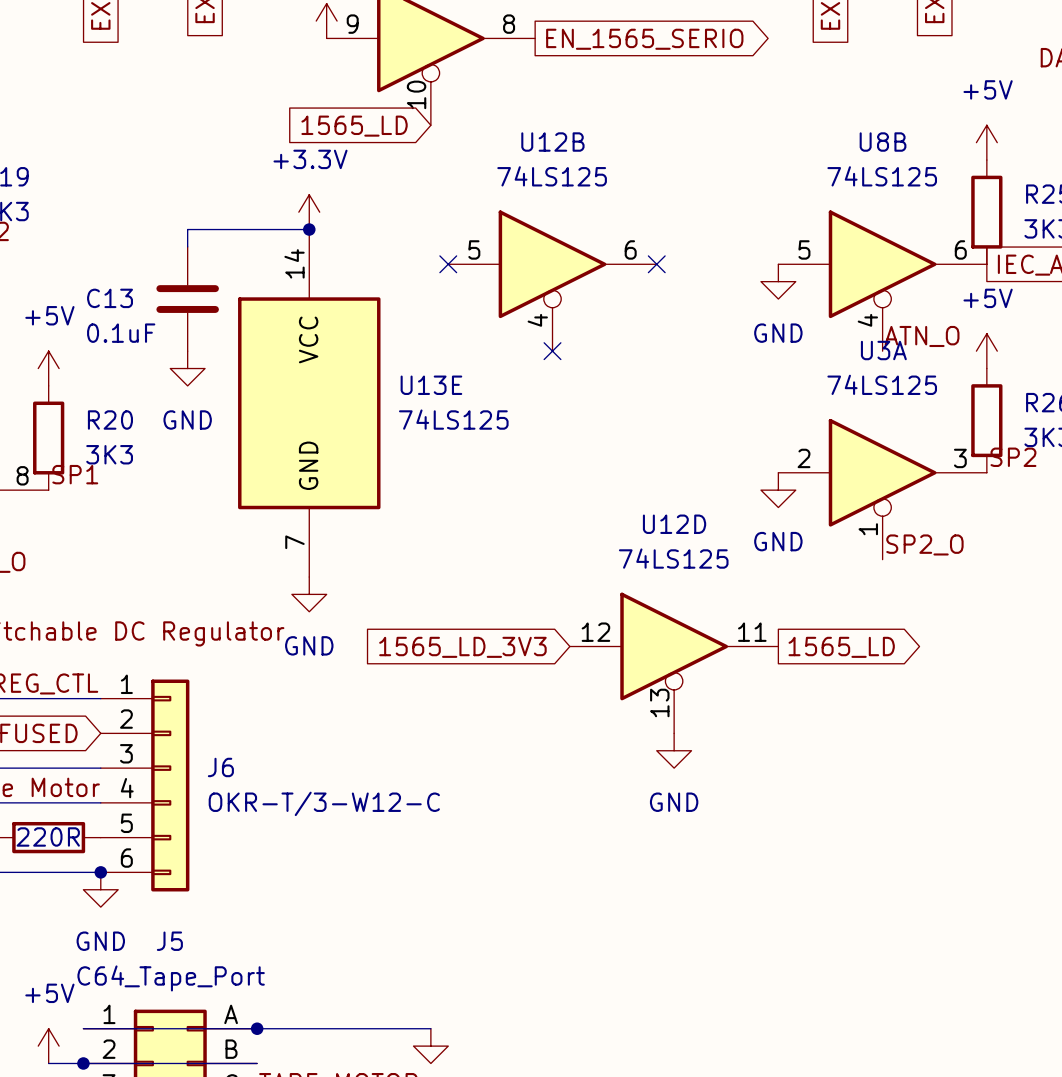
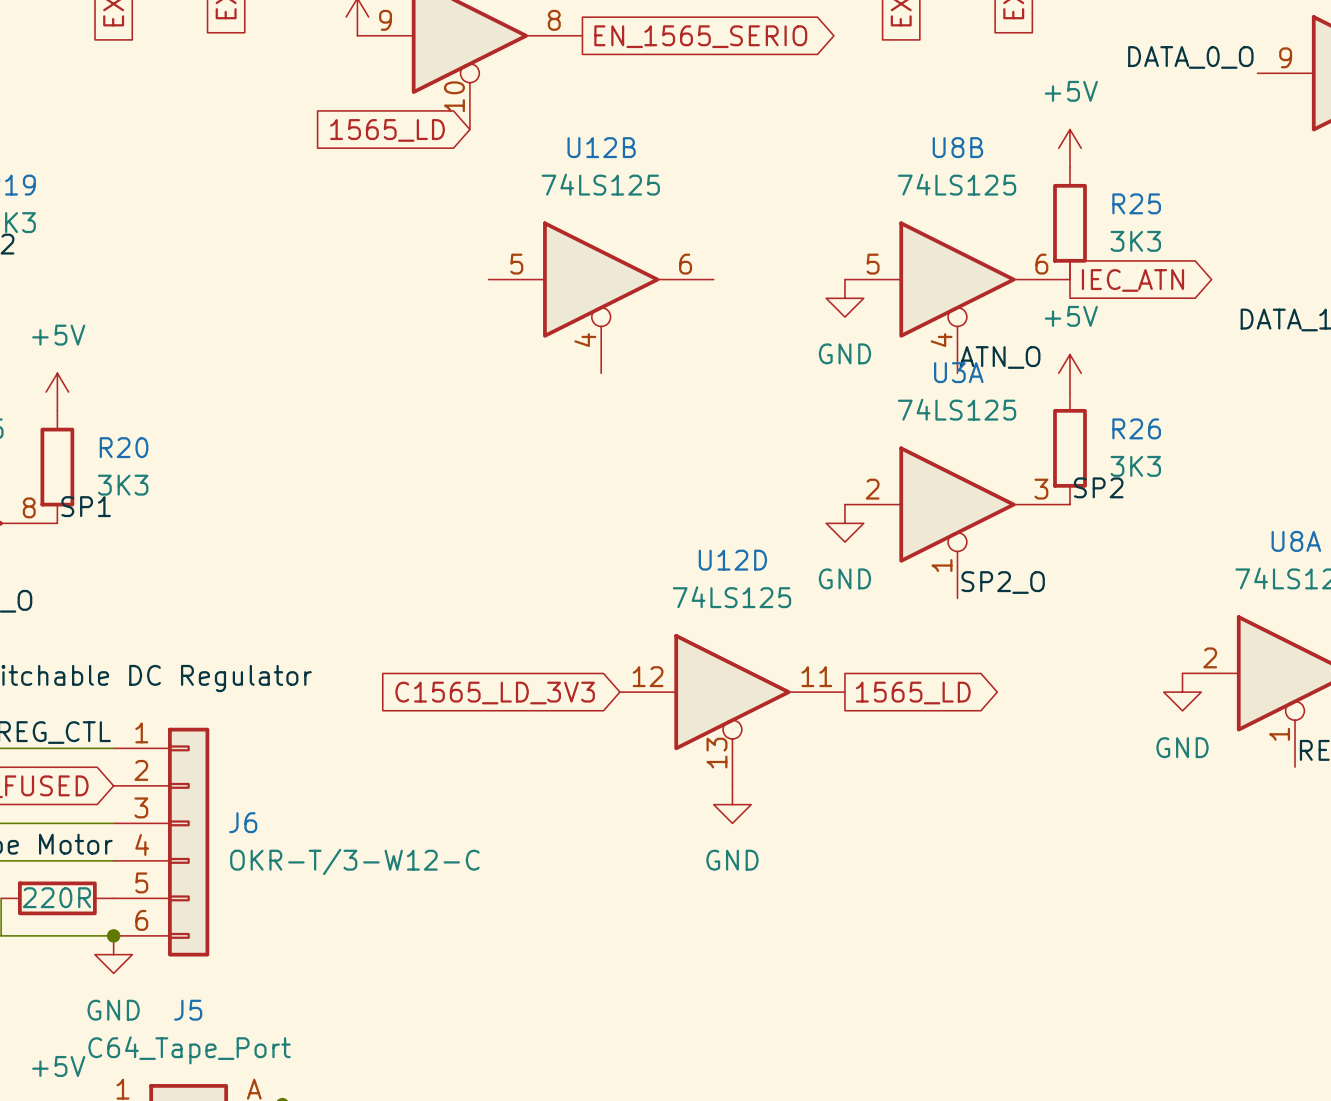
power symbol: +3.3V (309, 212) -> none
wire: (309, 229) (187, 229) (187, 246) -> none
junction: (309, 229) -> none
no-connect mark: (448, 264) -> none
no-connect mark: (656, 264) -> none
C13: 0.1uF (187, 299) -> none
no-connect mark: (552, 351) -> none
power symbol: GND (187, 368) -> none
U13E: 74LS125 (309, 403) -> none
power symbol: GND (309, 594) -> none
global label: 1565_LD_3V3 (462, 647) -> C1565_LD_3V3 (495, 693)

